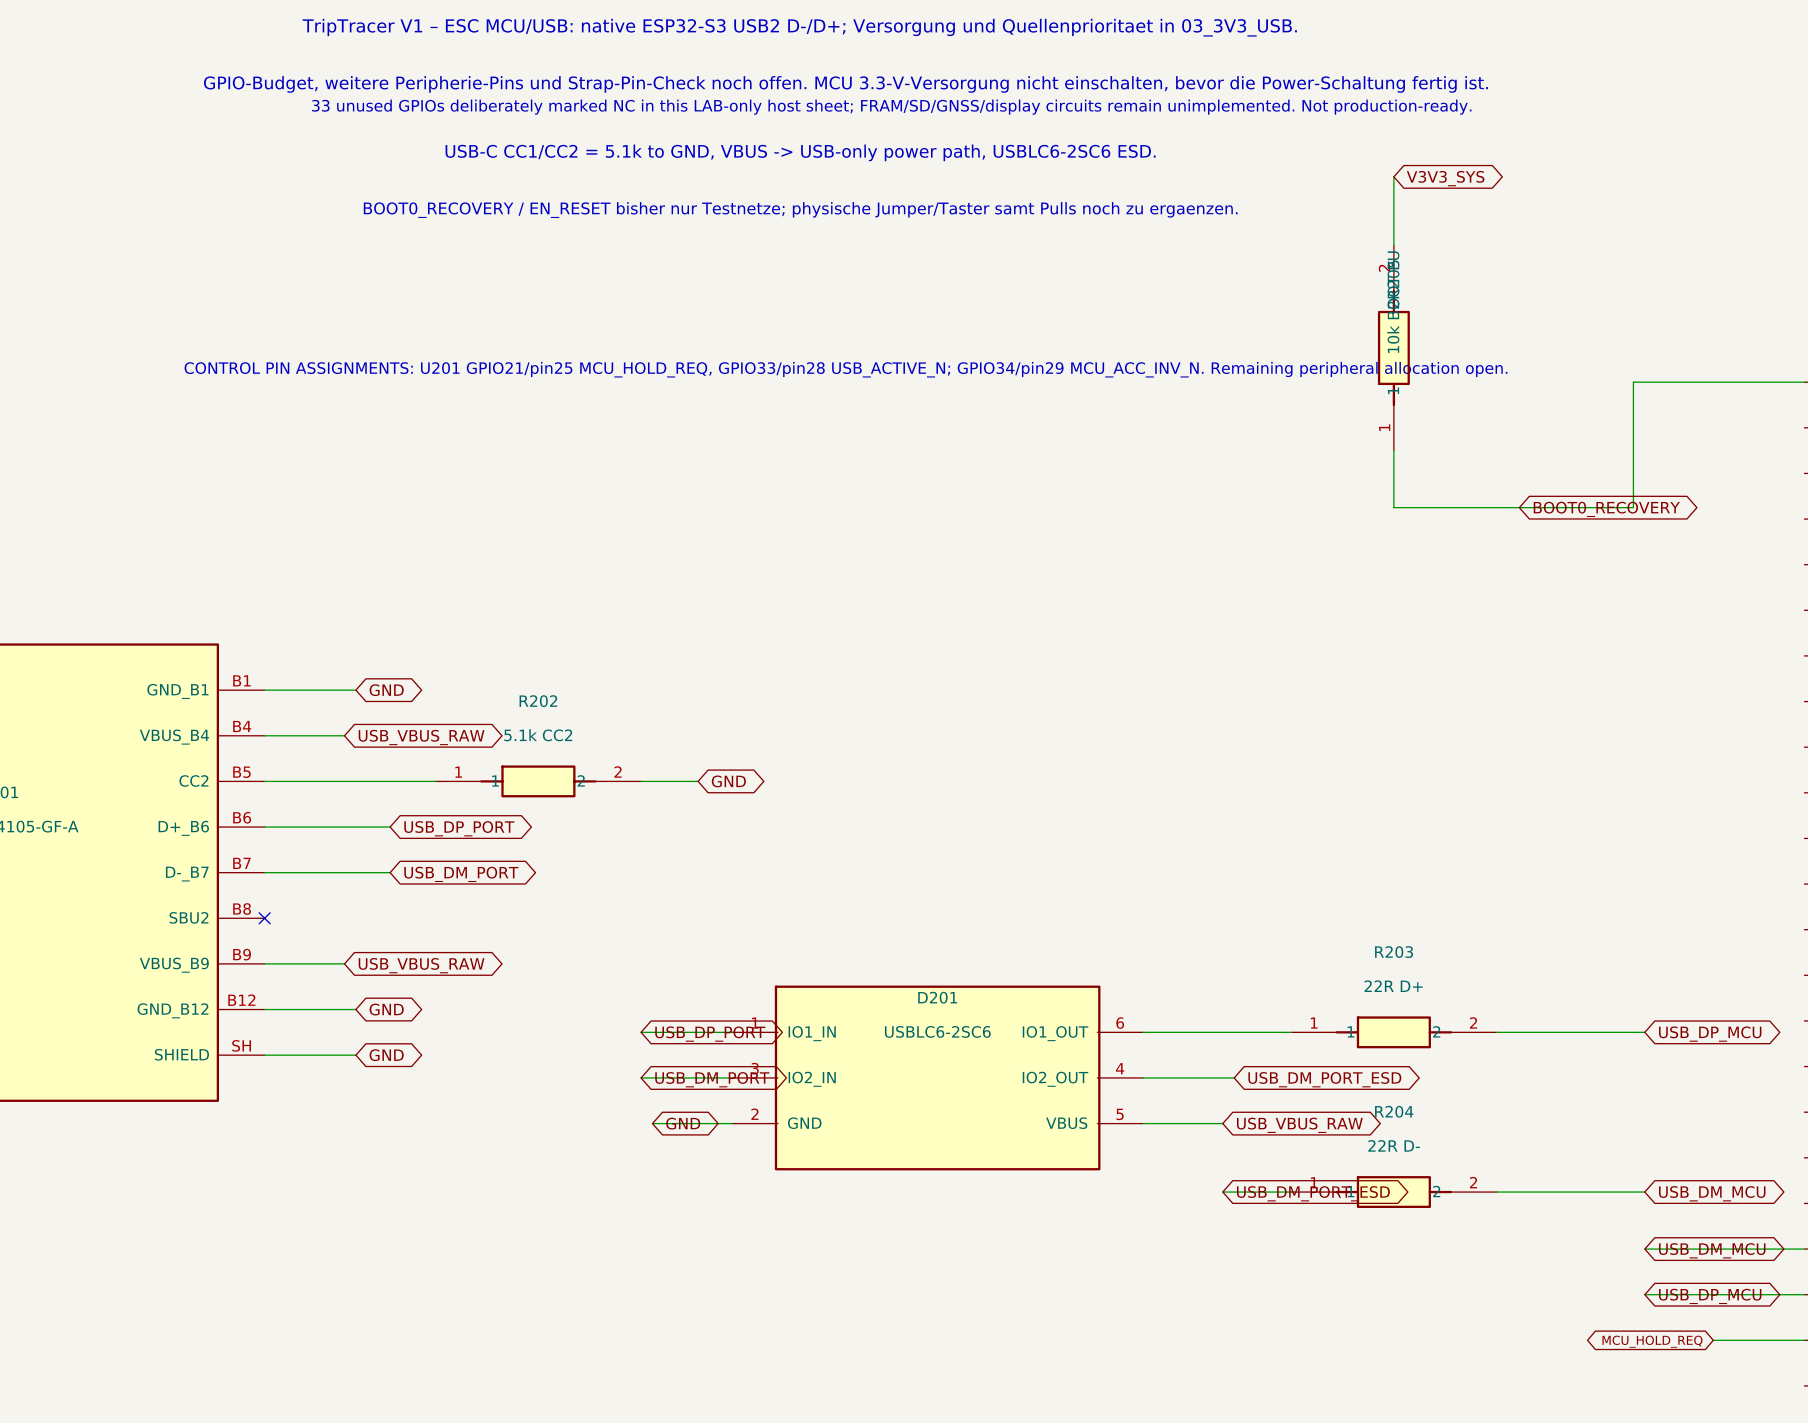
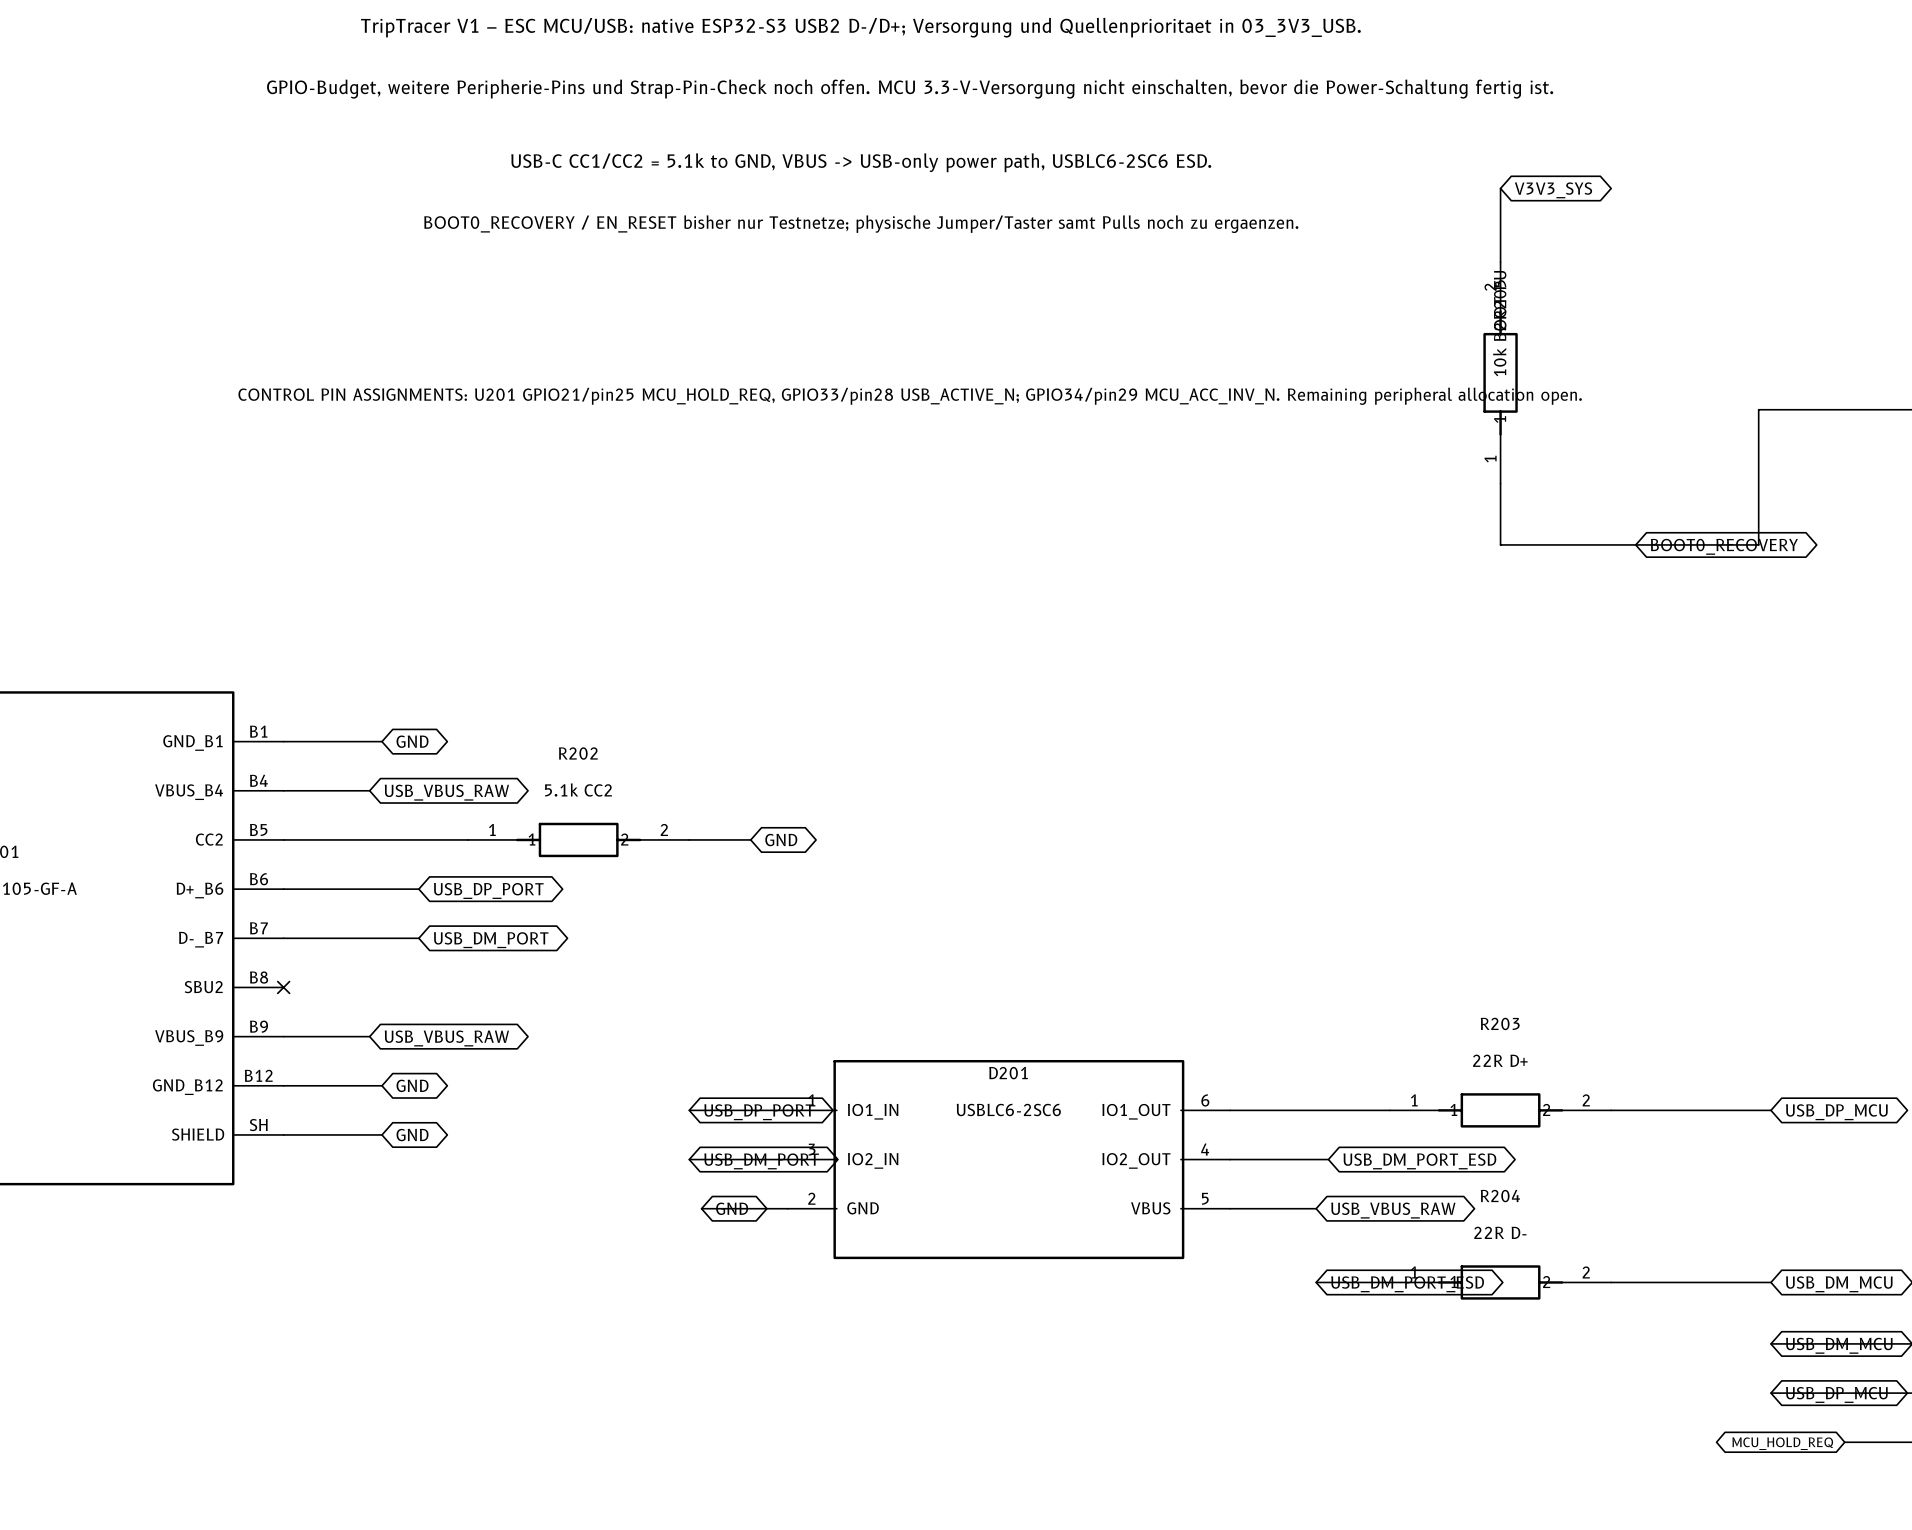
text: 33 unused GPIOs deliberately marked NC in this LAB-only host sheet; FRAM/SD/GNSS/display circuits remain unimplemented. Not production-ready. (891, 107) -> none

